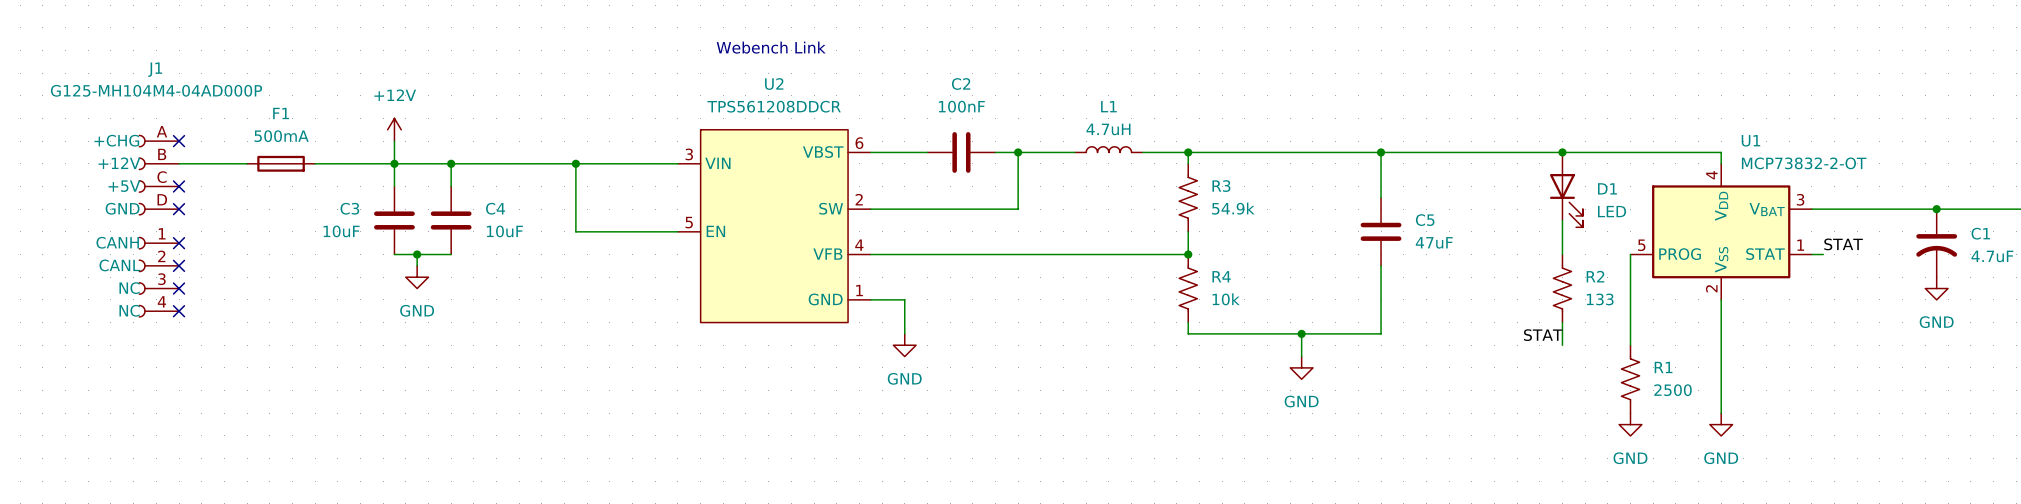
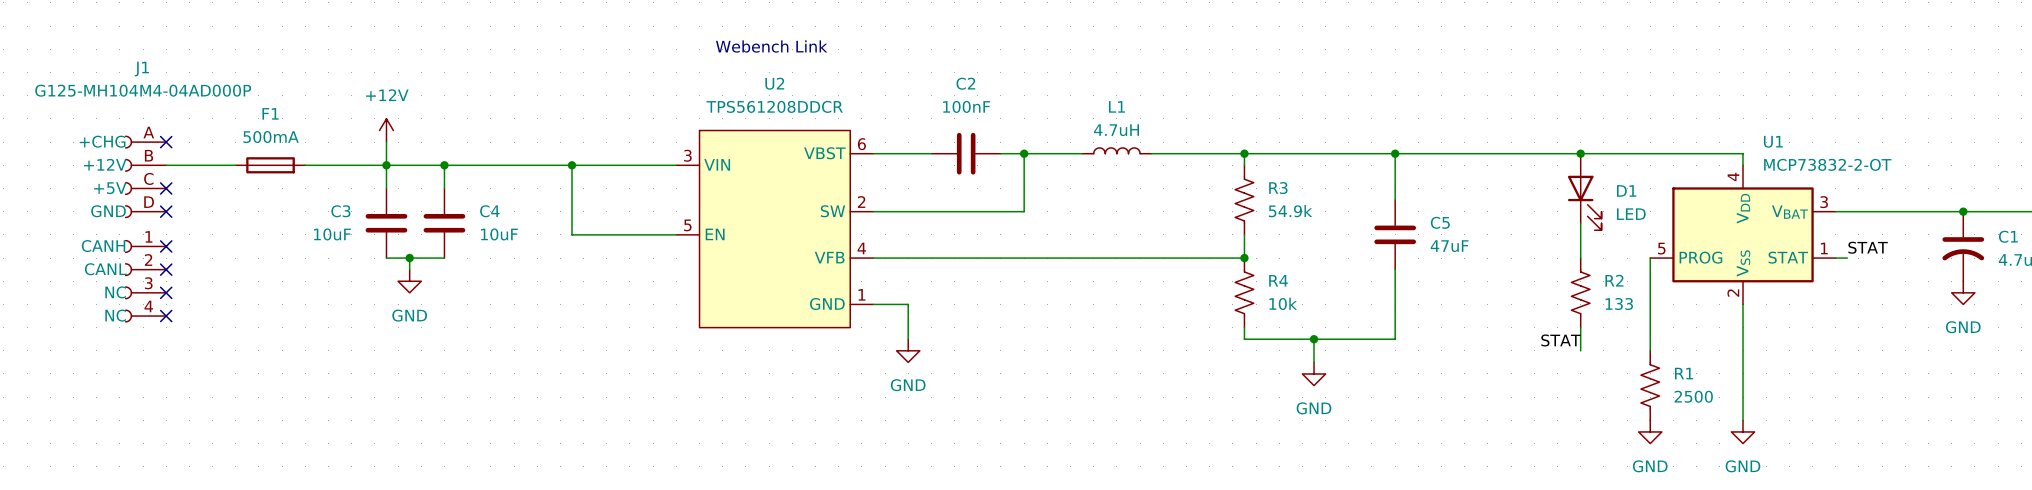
wire: (1188, 152) (1188, 163) -> (1244, 153) (1244, 165)
junction position: (1188, 152) -> (1244, 153)
R3 position: (1188, 197) -> (1244, 200)
wire: (1188, 231) (1188, 254) -> (1244, 234) (1244, 258) (1198, 258)
junction position: (1188, 254) -> (1244, 258)
R4 position: (1188, 288) -> (1244, 292)
wire: (1188, 322) (1188, 333) (1233, 333) -> (1244, 327) (1244, 339)

